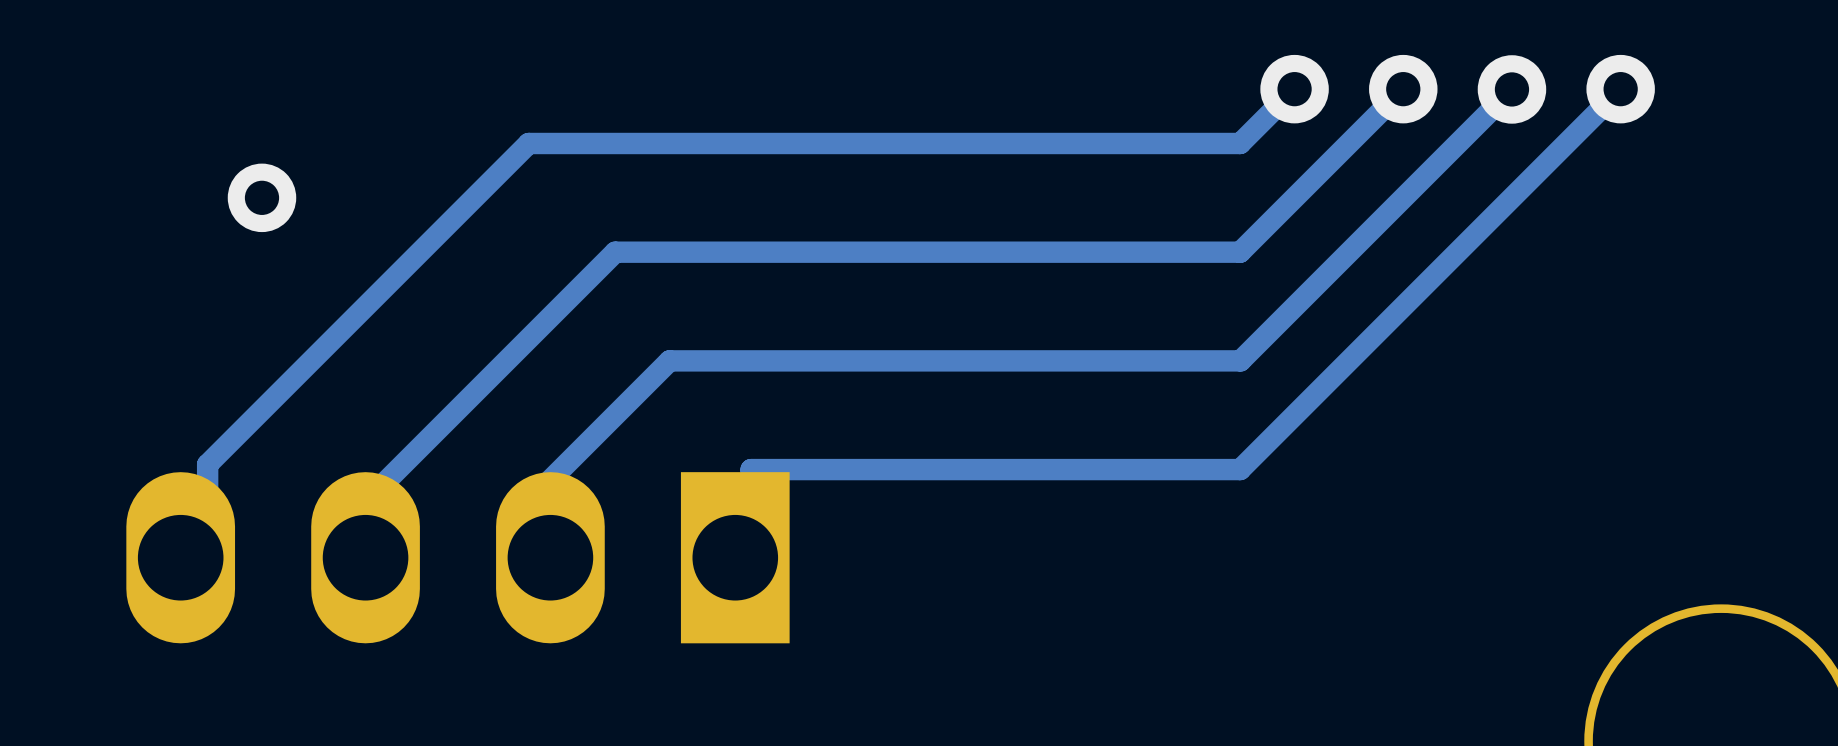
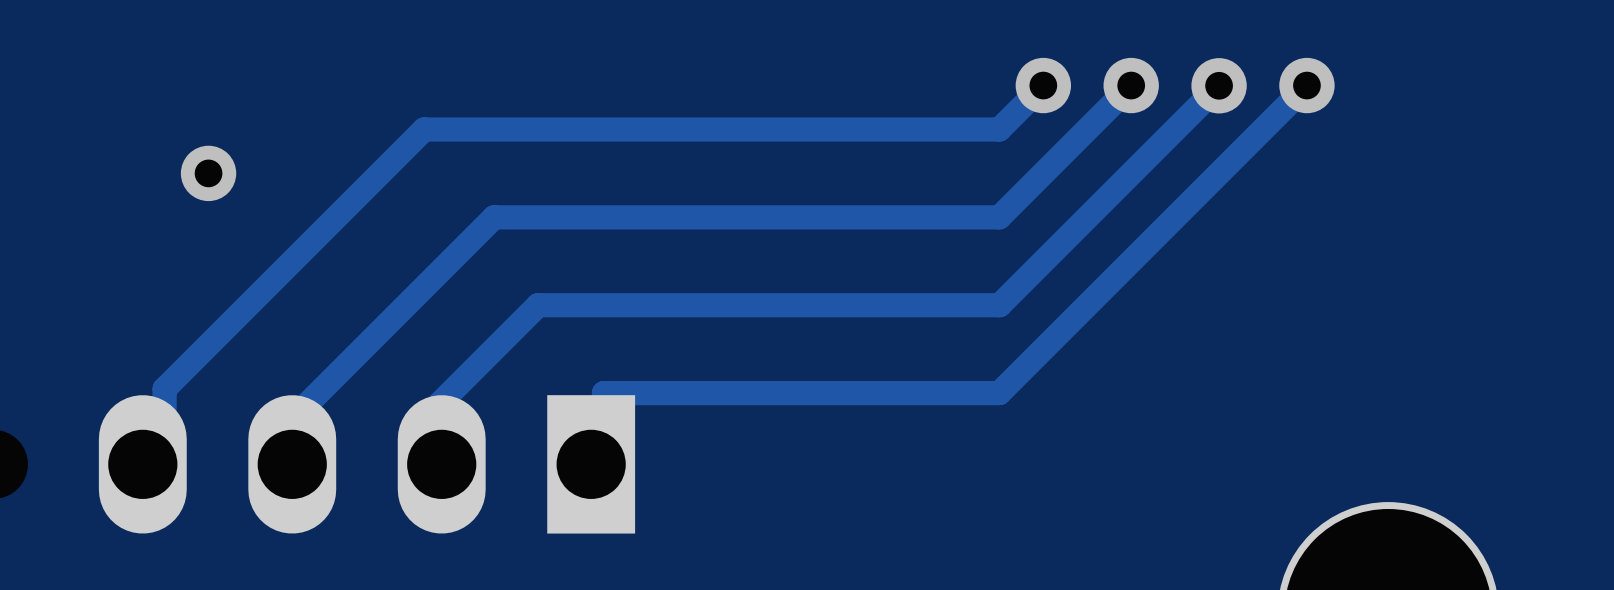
track width: thin (1294, 89) (1240, 143) (528, 143) (207, 464) (207, 578) -> thick (1043, 85) (999, 129) (424, 129) (164, 389) (164, 480)
track width: thin (1403, 89) (1240, 252) (615, 252) (370, 496) (370, 578) -> thick (1131, 85) (999, 217) (494, 217) (296, 415) (296, 480)
track width: thin (1511, 89) (1240, 360) (669, 360) (533, 496) (533, 578) -> thick (1219, 85) (999, 305) (538, 305) (428, 415) (428, 480)
track width: thin (1620, 89) (1240, 469) (751, 469) (751, 578) -> thick (1306, 85) (999, 393) (603, 393) (603, 480)

